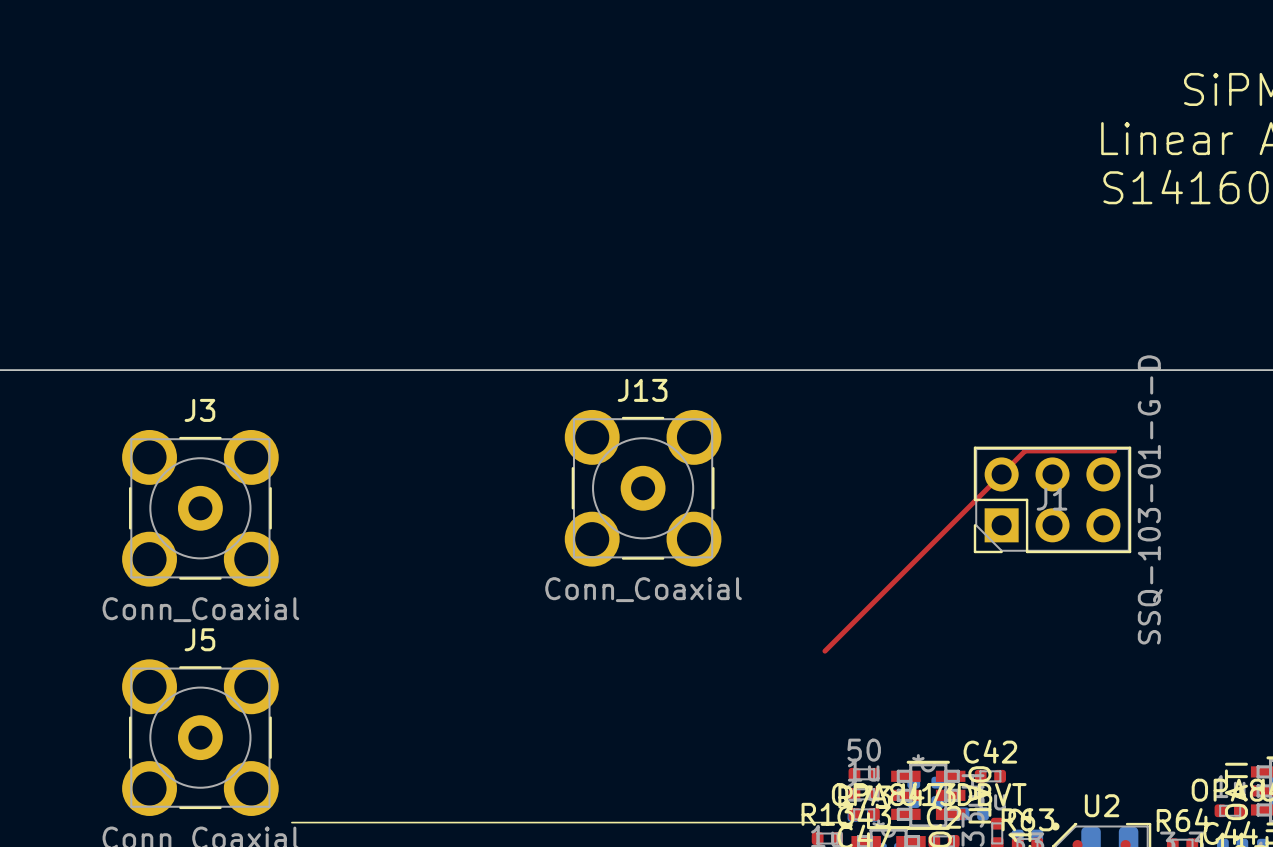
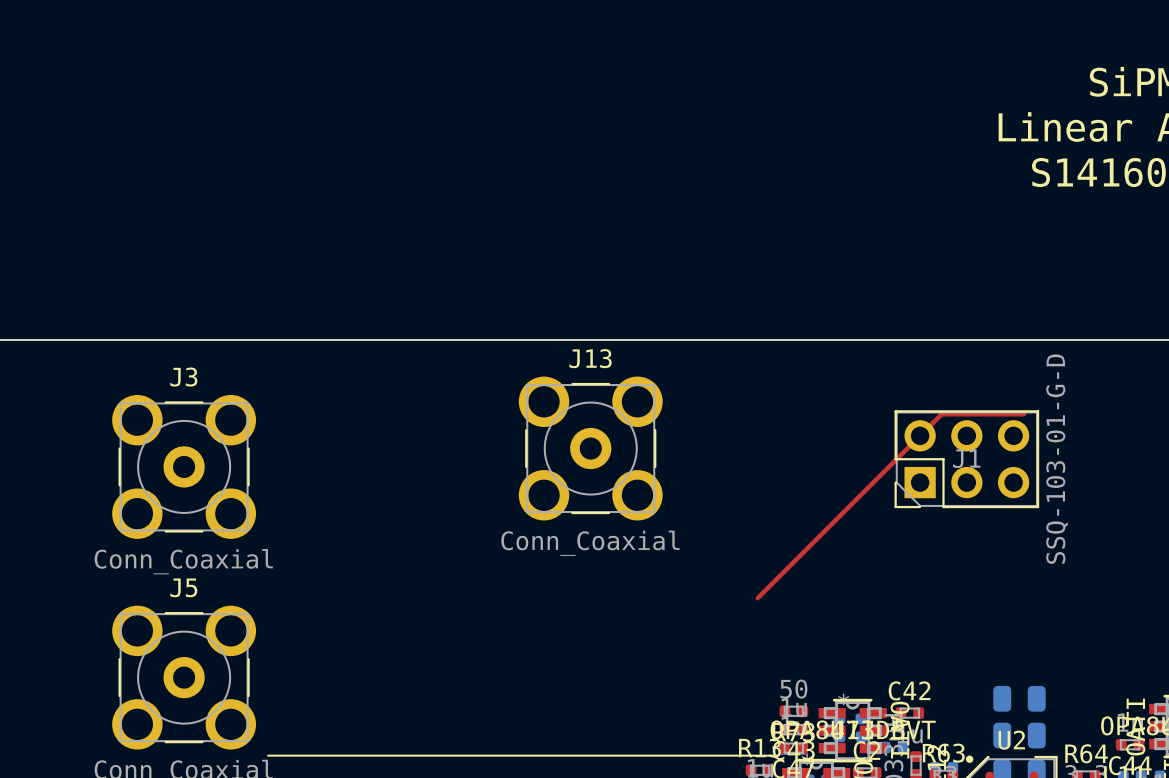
part: none -> (1019, 698)
part: none -> (1019, 735)

